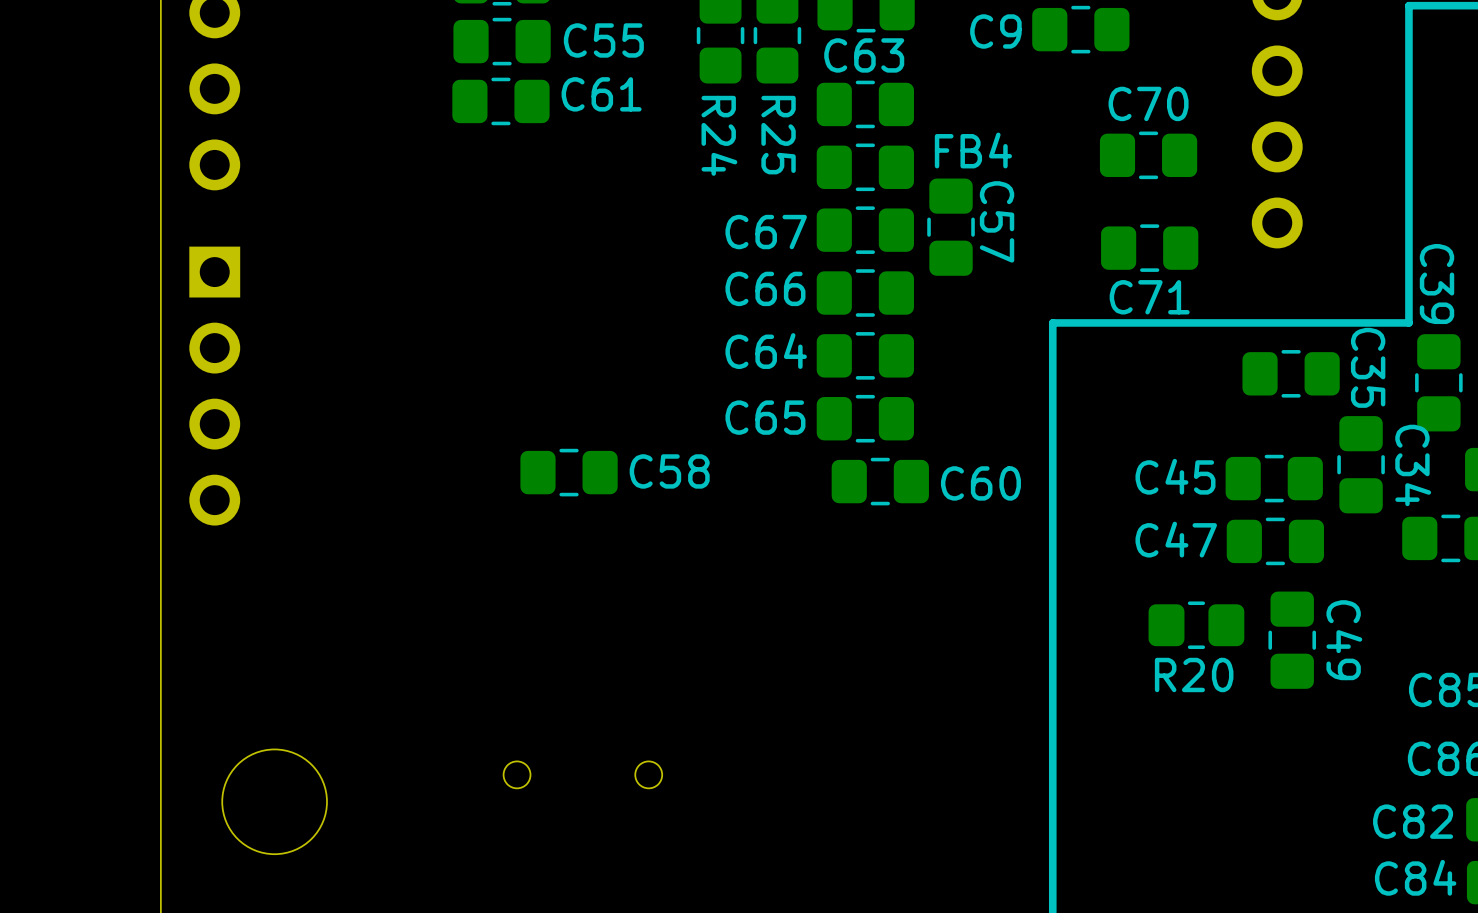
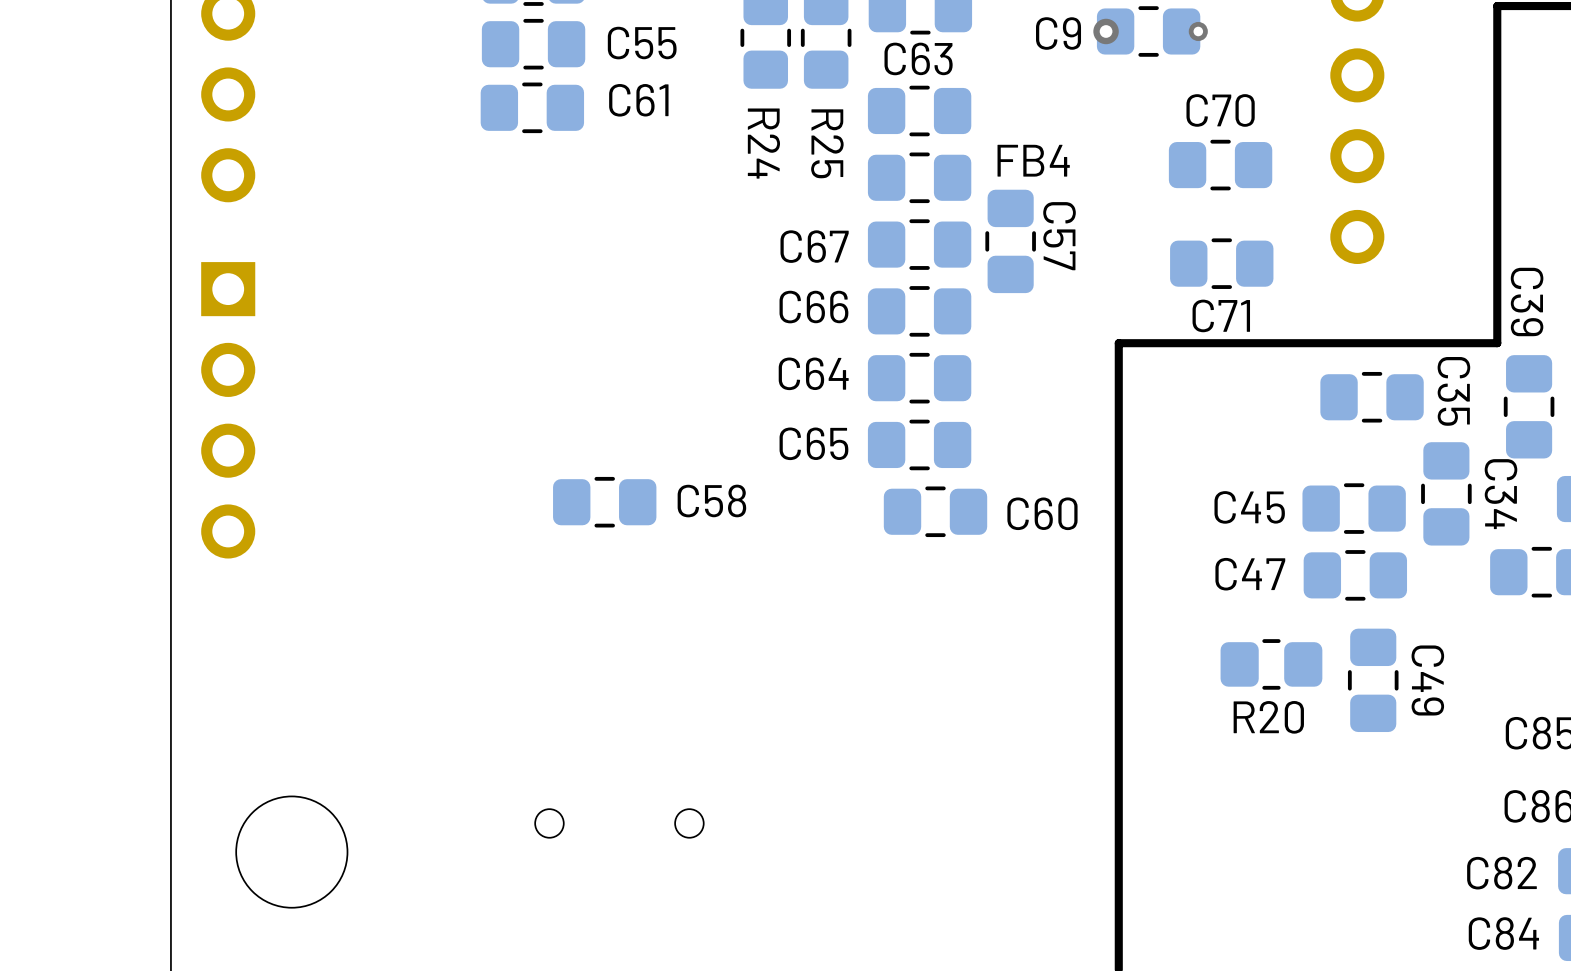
via: none -> (1106, 31)
via: none -> (1198, 31)

